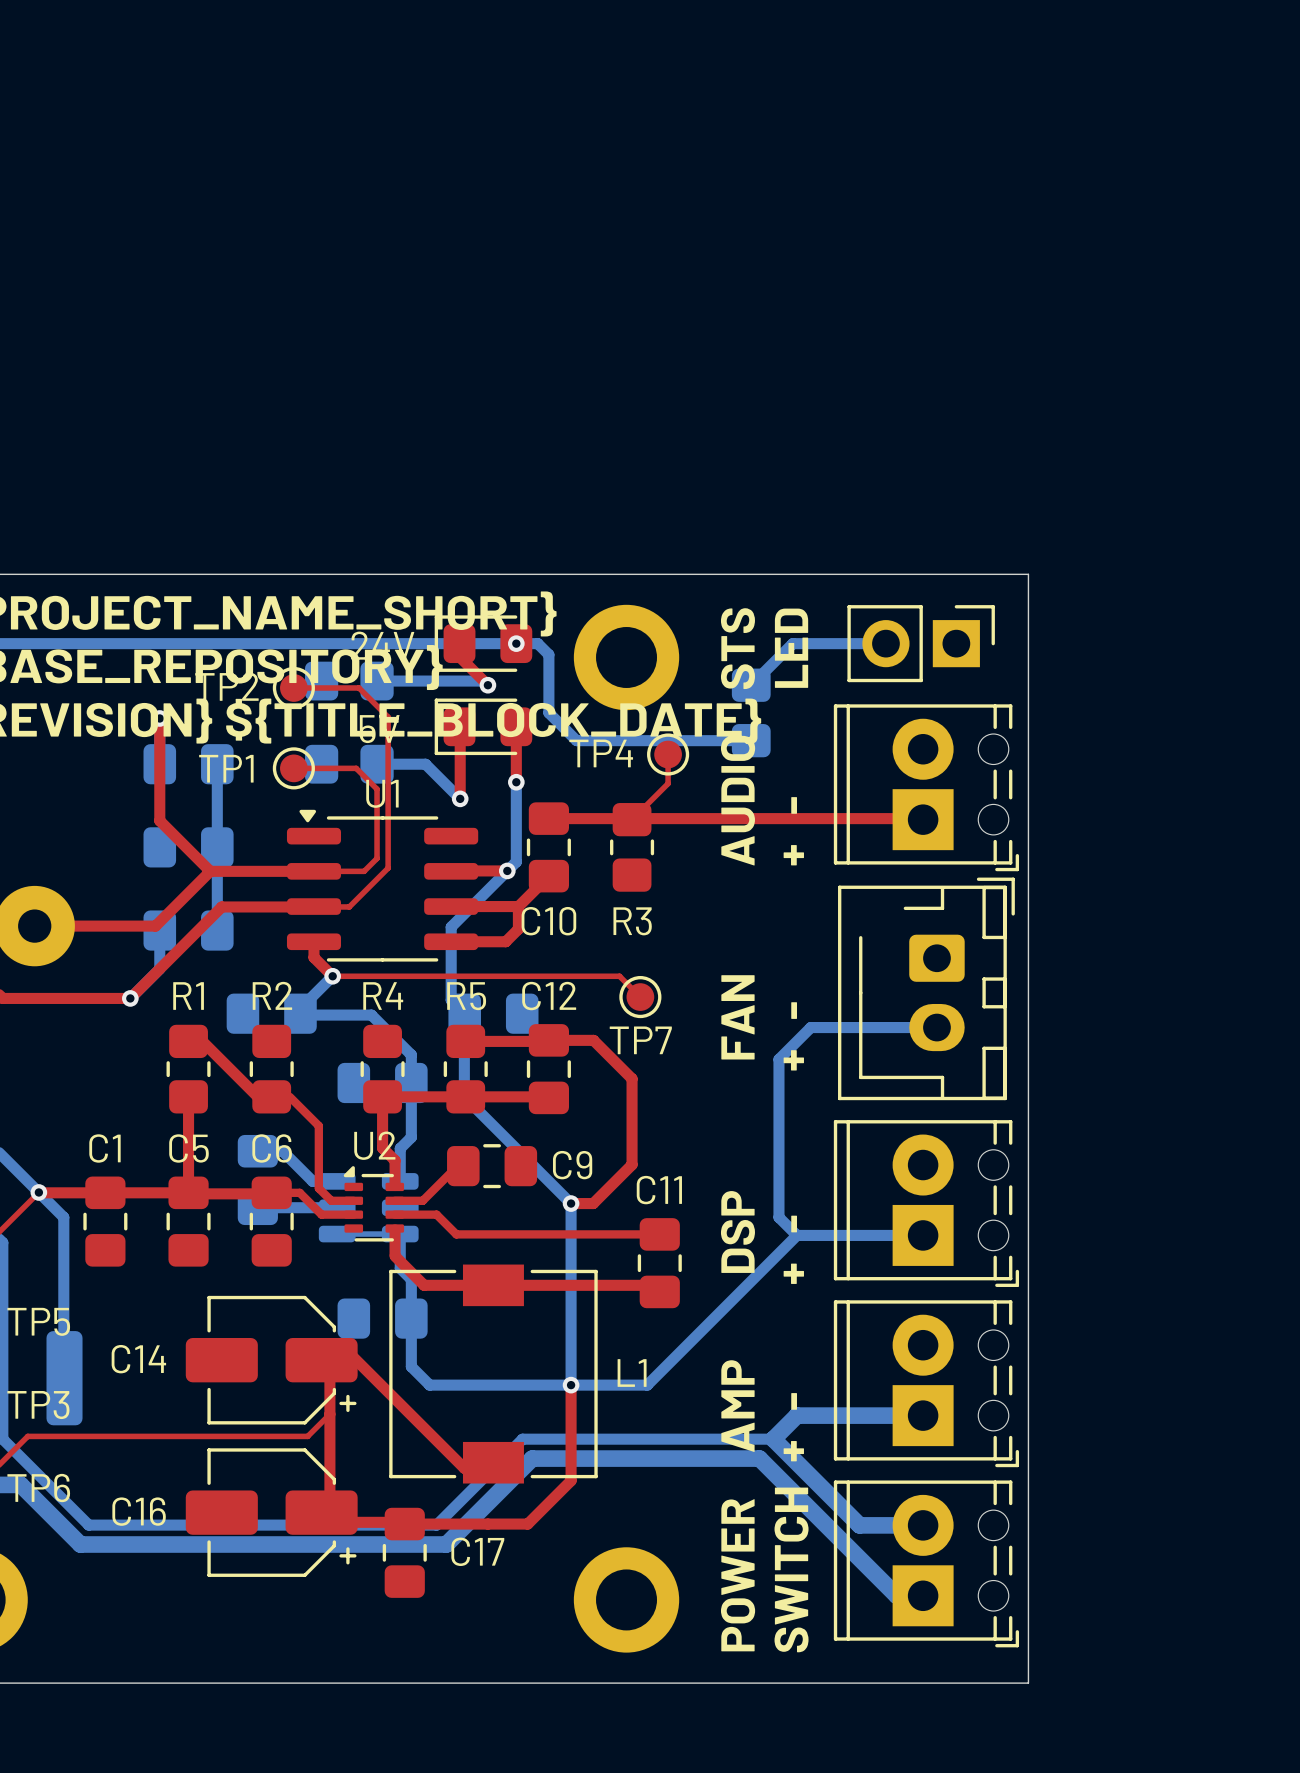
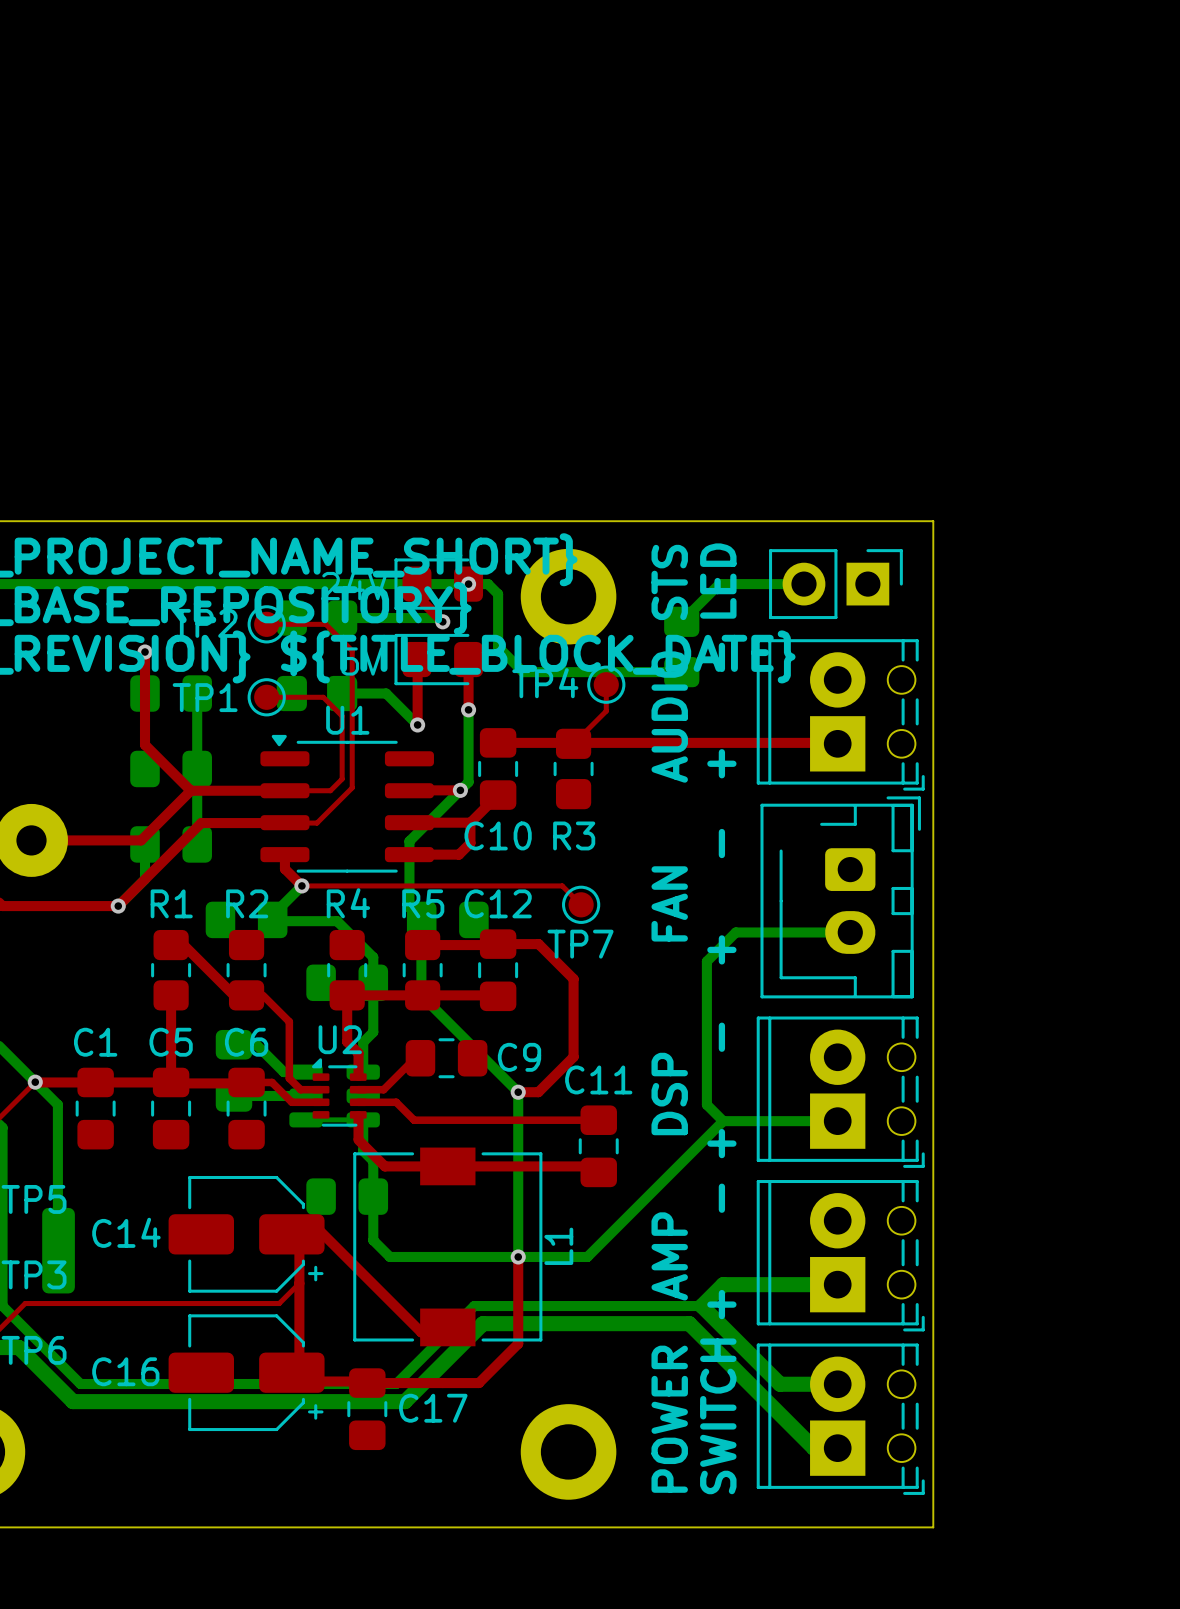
L1 name rotation: 0° (632, 1373) -> 90° counterclockwise (558, 1246)

